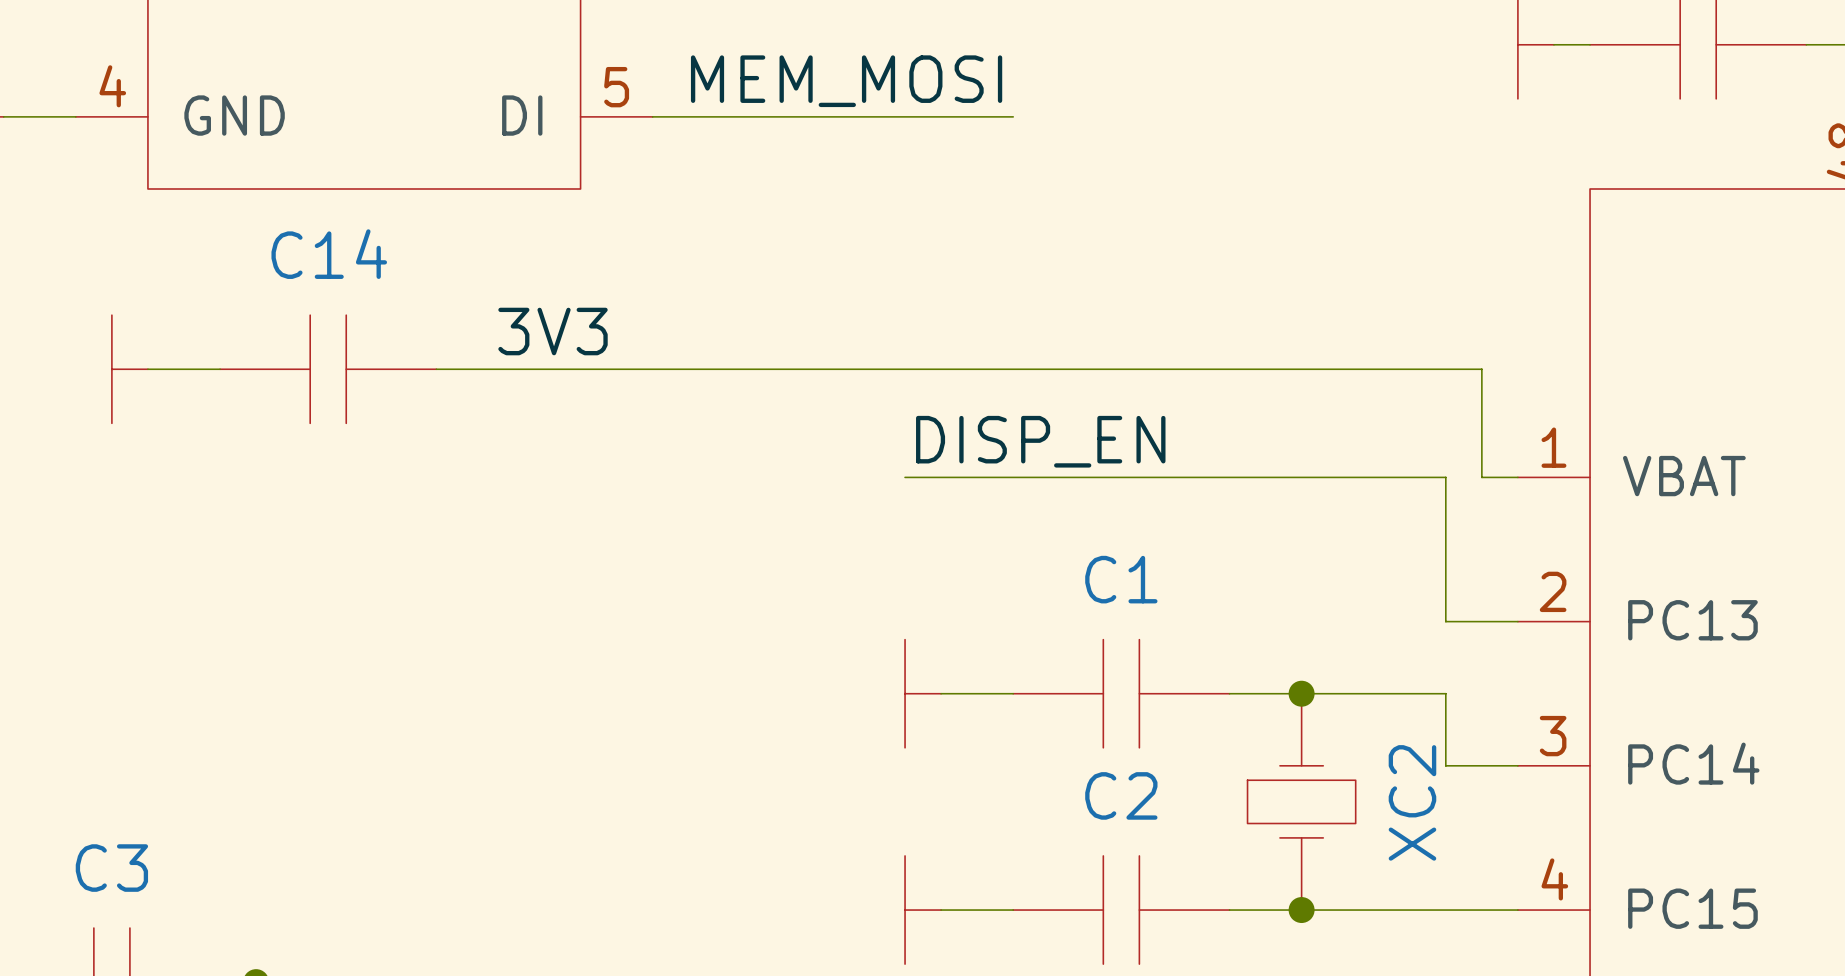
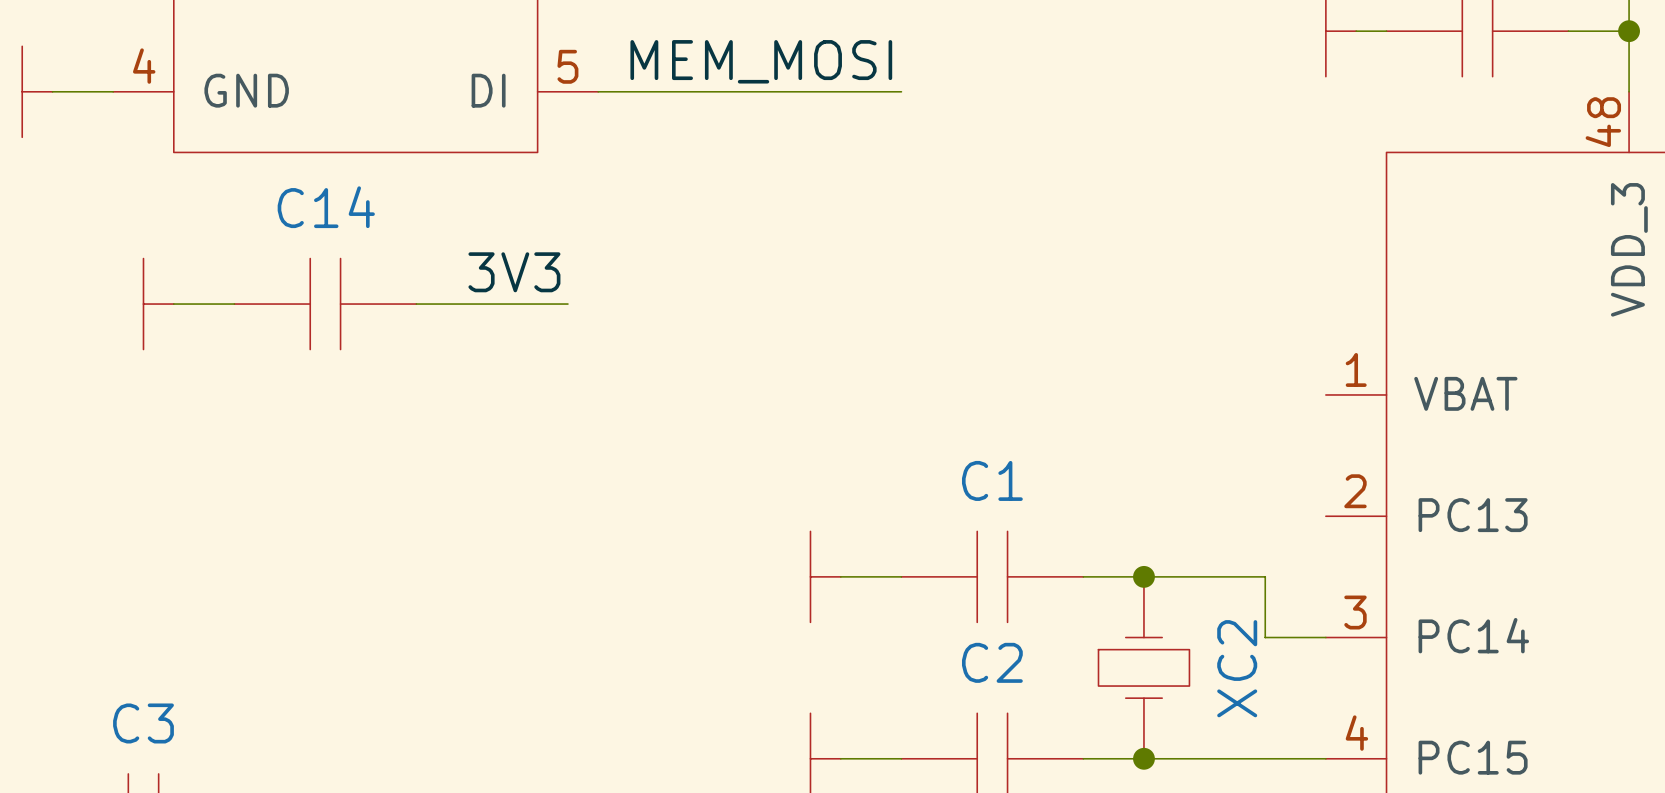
wire: (616, 369) (1481, 369) (1481, 477) (1517, 477) -> none
label: DISP_EN (1040, 441) -> none
wire: (905, 477) (1445, 477) (1445, 621) (1517, 621) -> none

